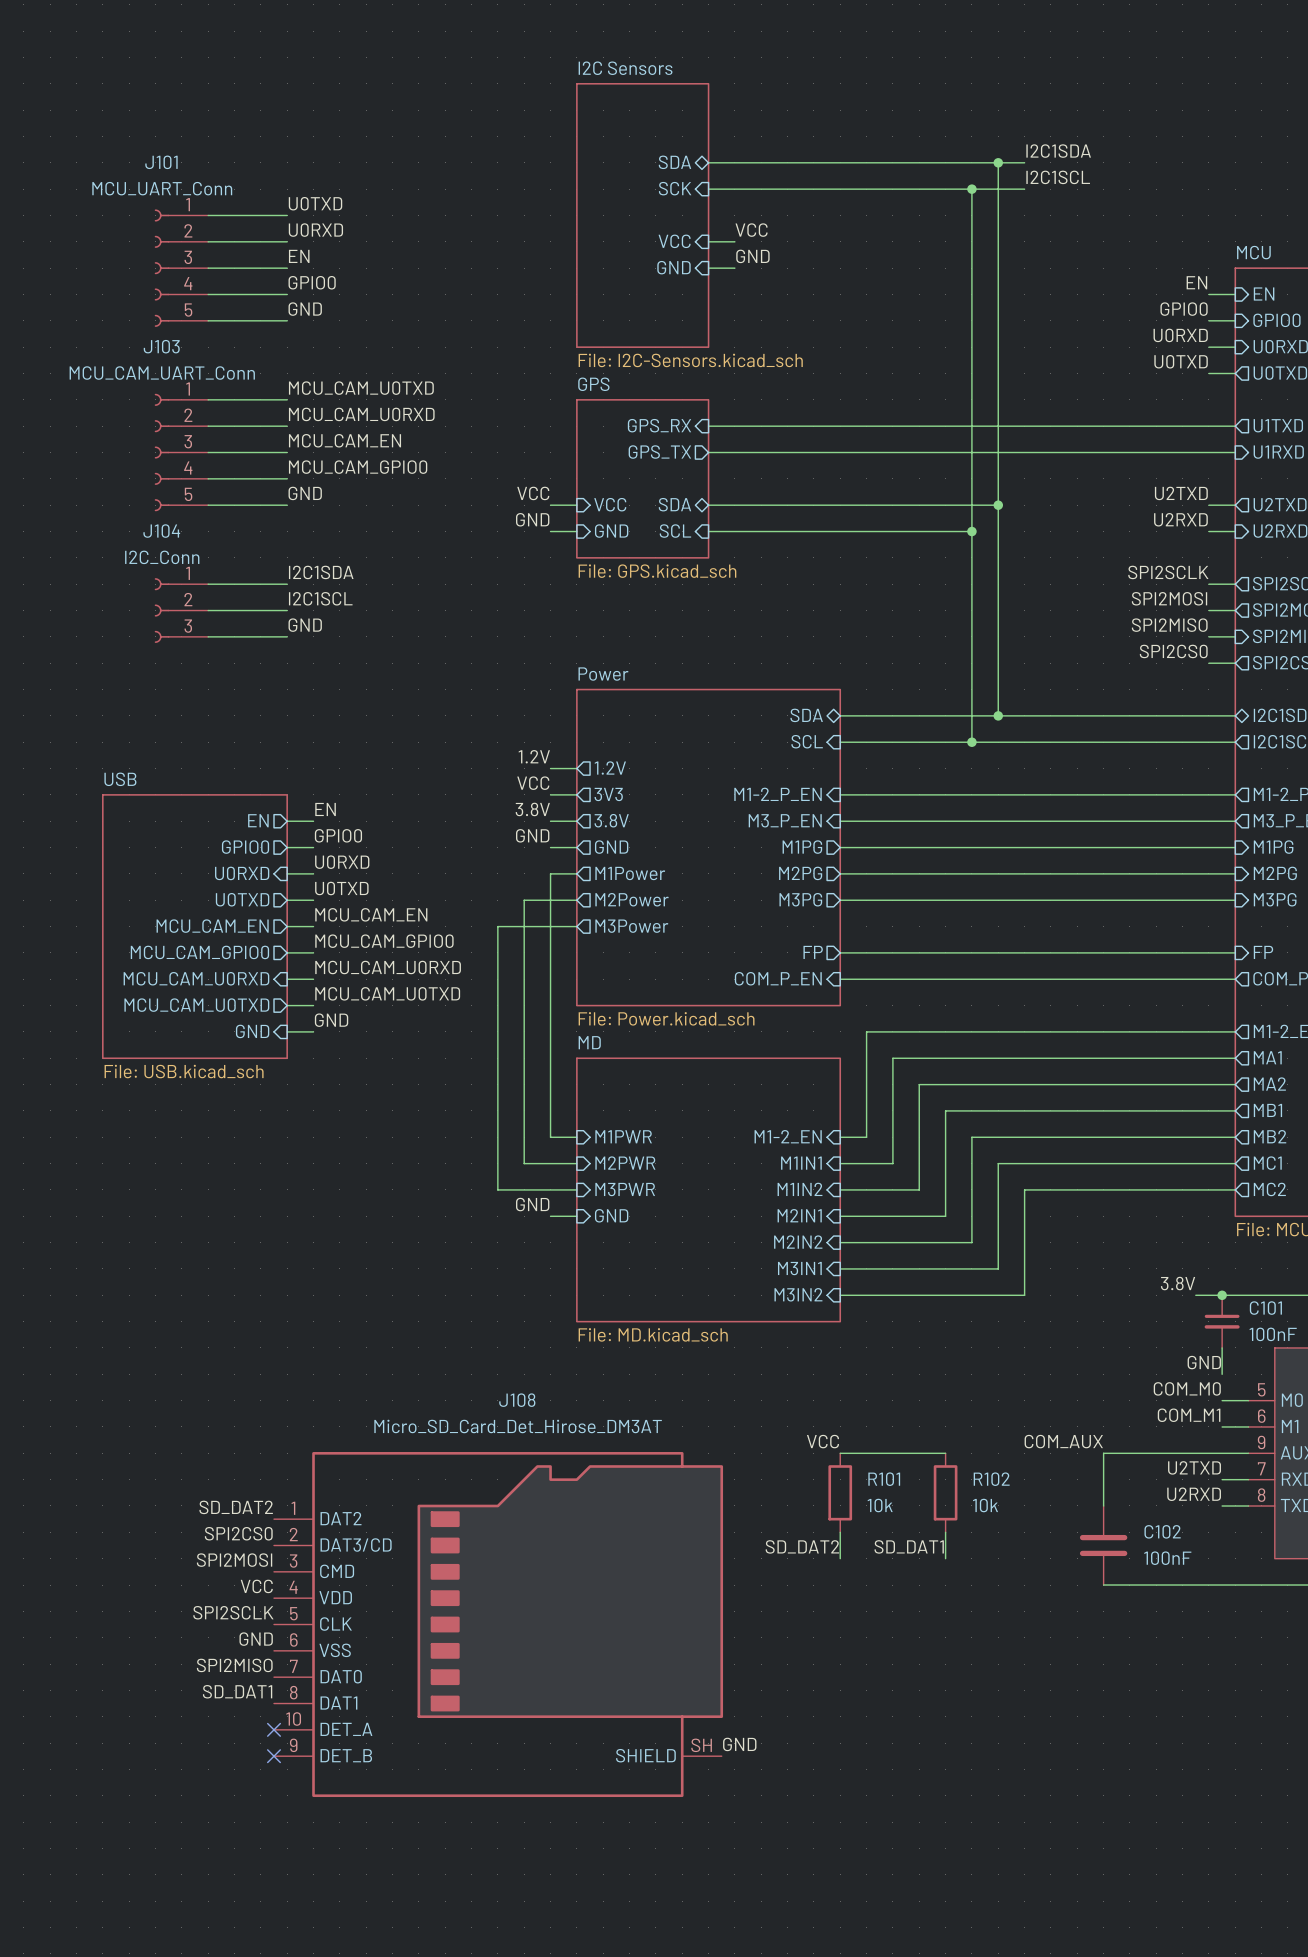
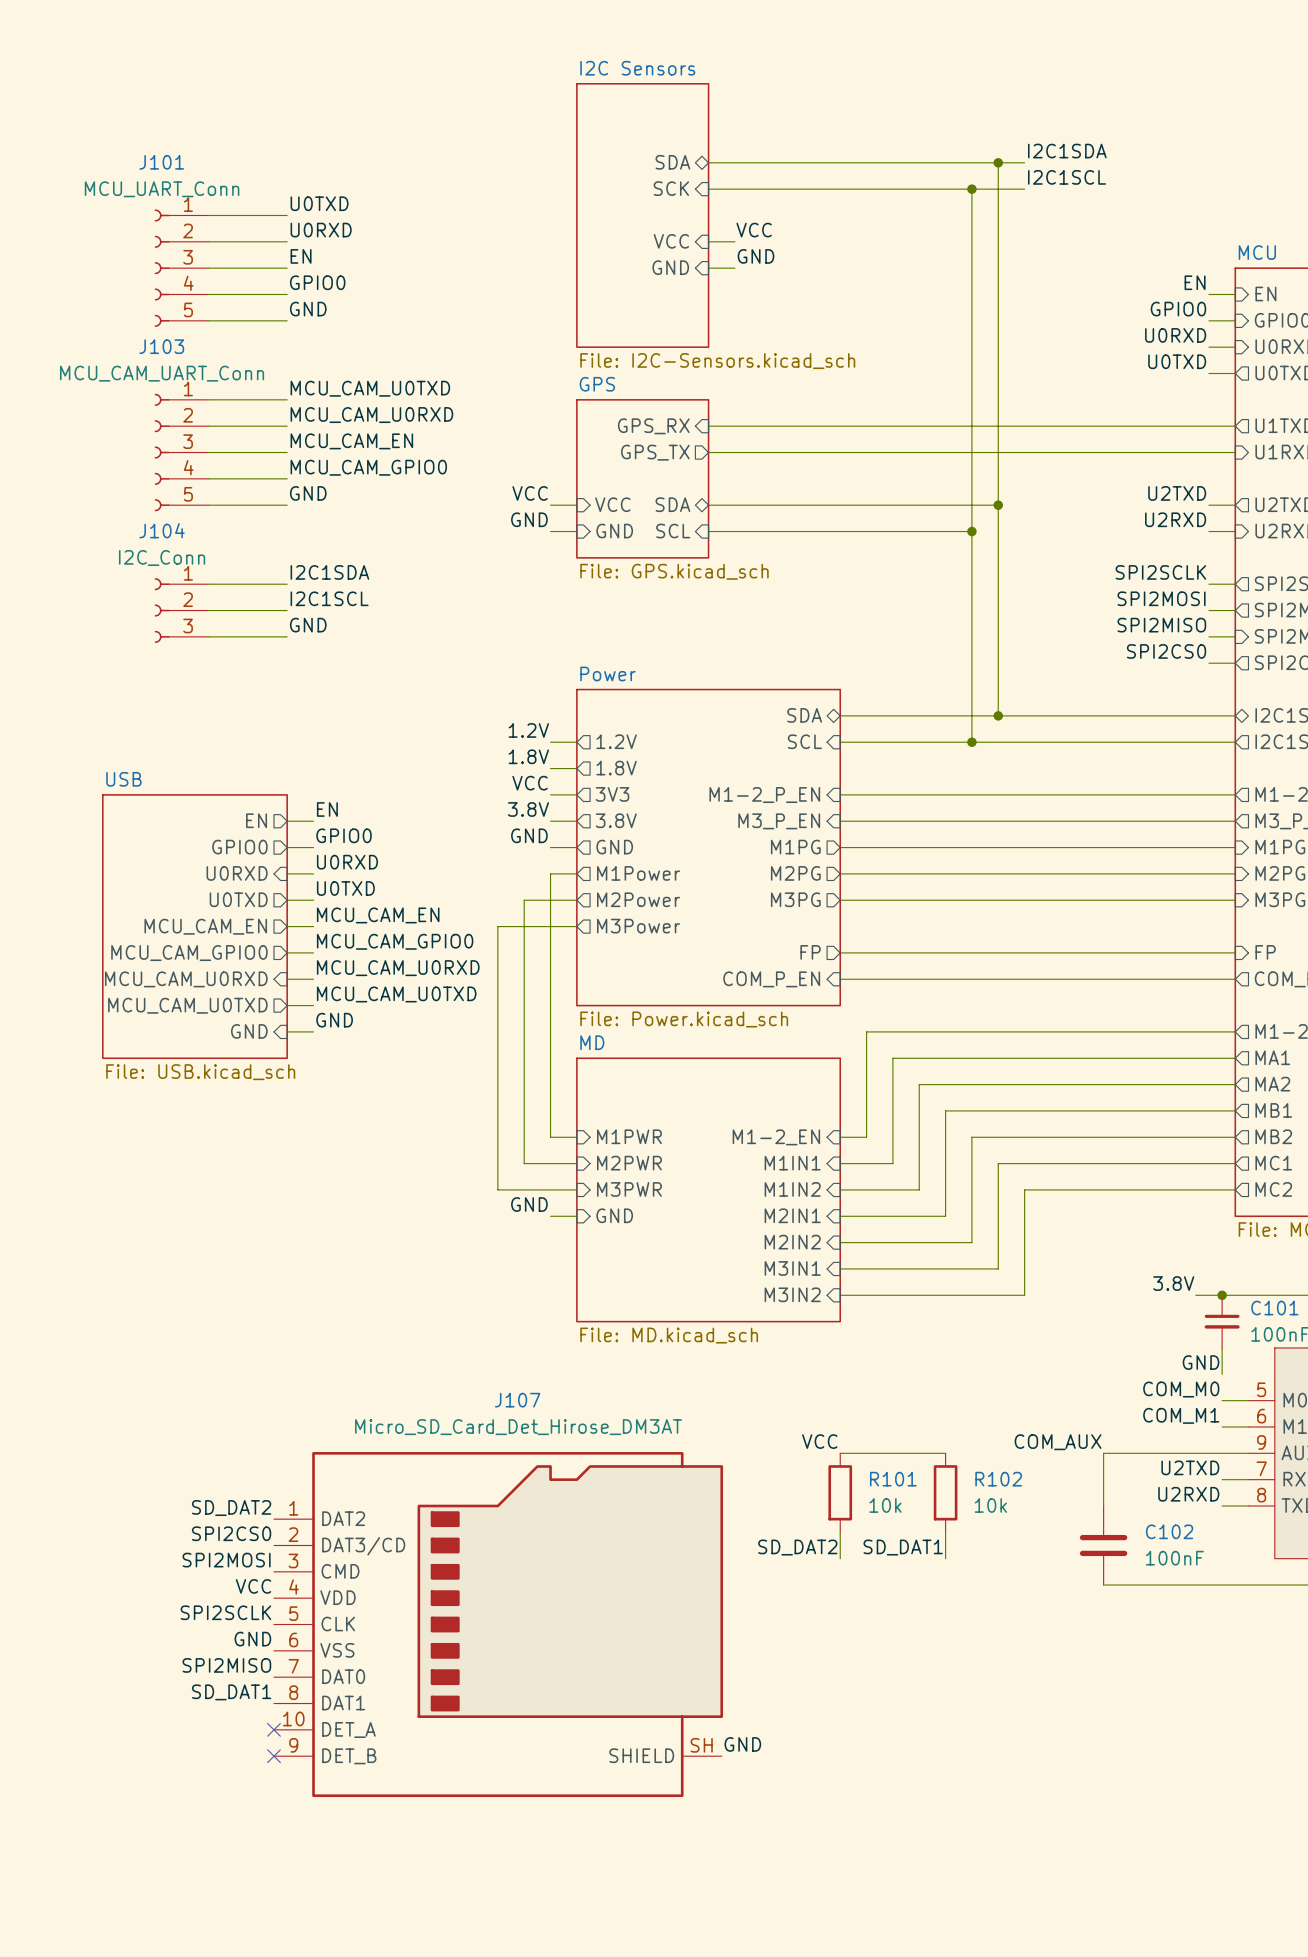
label: none -> 1.2V (528, 730)
sheet pin: none -> 1.2V (616, 741)
wire: none -> (550, 742) (576, 742)
label: 1.2V (534, 756) -> 1.8V (528, 756)
sheet pin: 1.2V (610, 768) -> 1.8V (616, 768)
J108 name: J108 (517, 1400) -> J107 (517, 1400)

